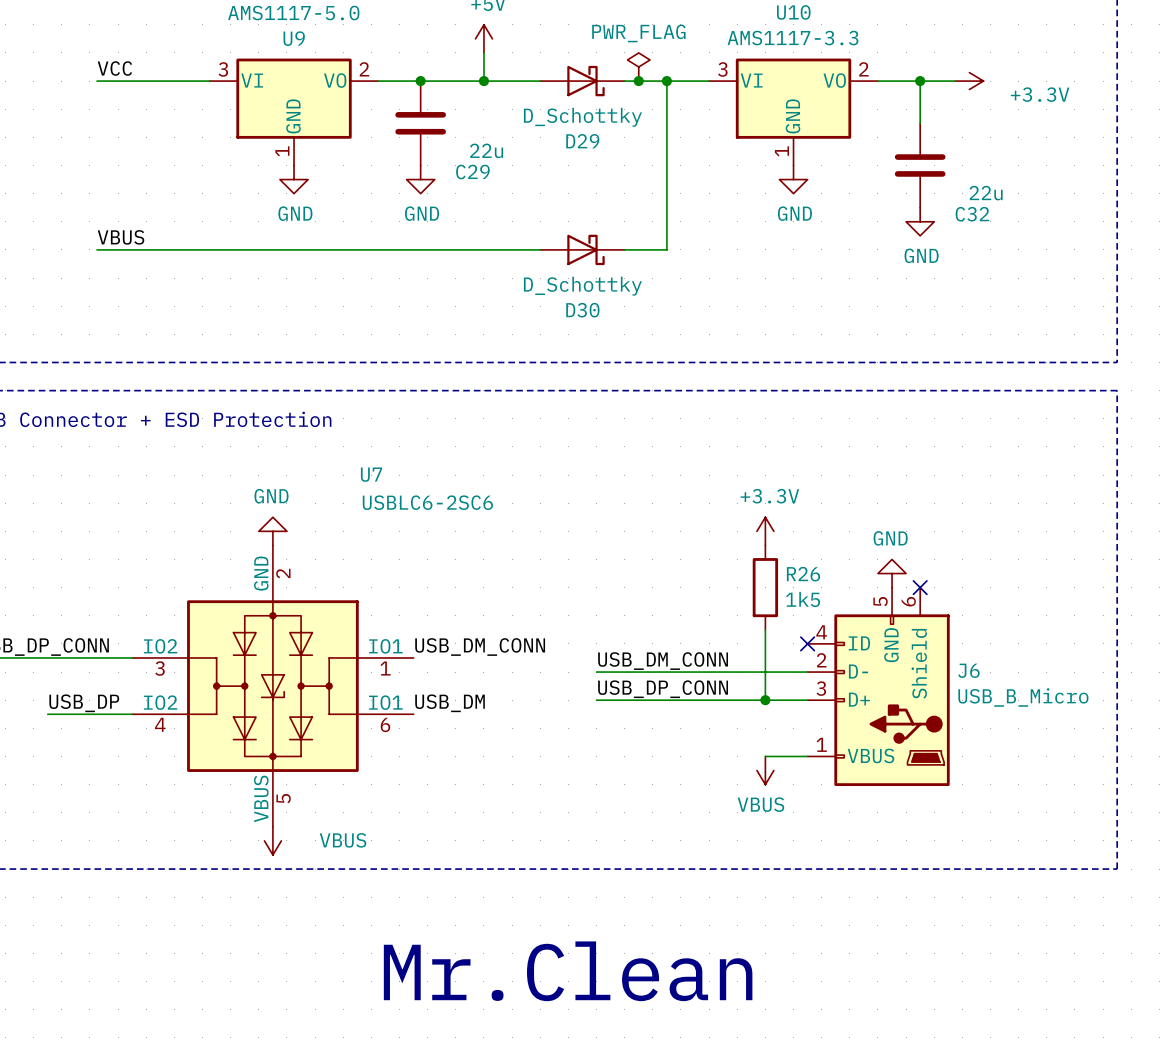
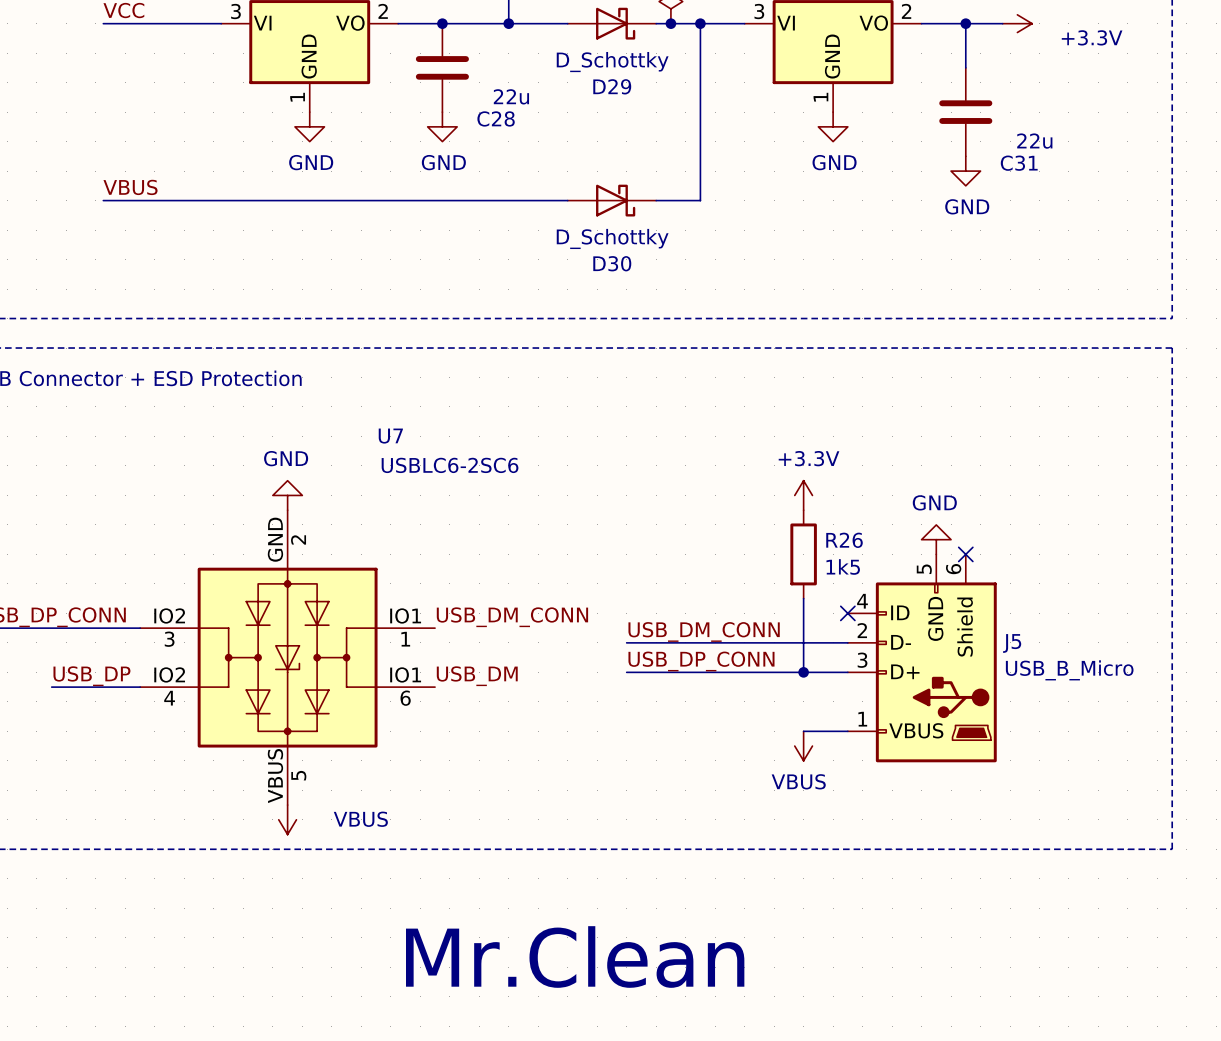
C29 name: C29 (472, 172) -> C28 (496, 118)
C32 name: C32 (972, 214) -> C31 (1019, 163)
J6 name: J6 (968, 670) -> J5 (1012, 643)

